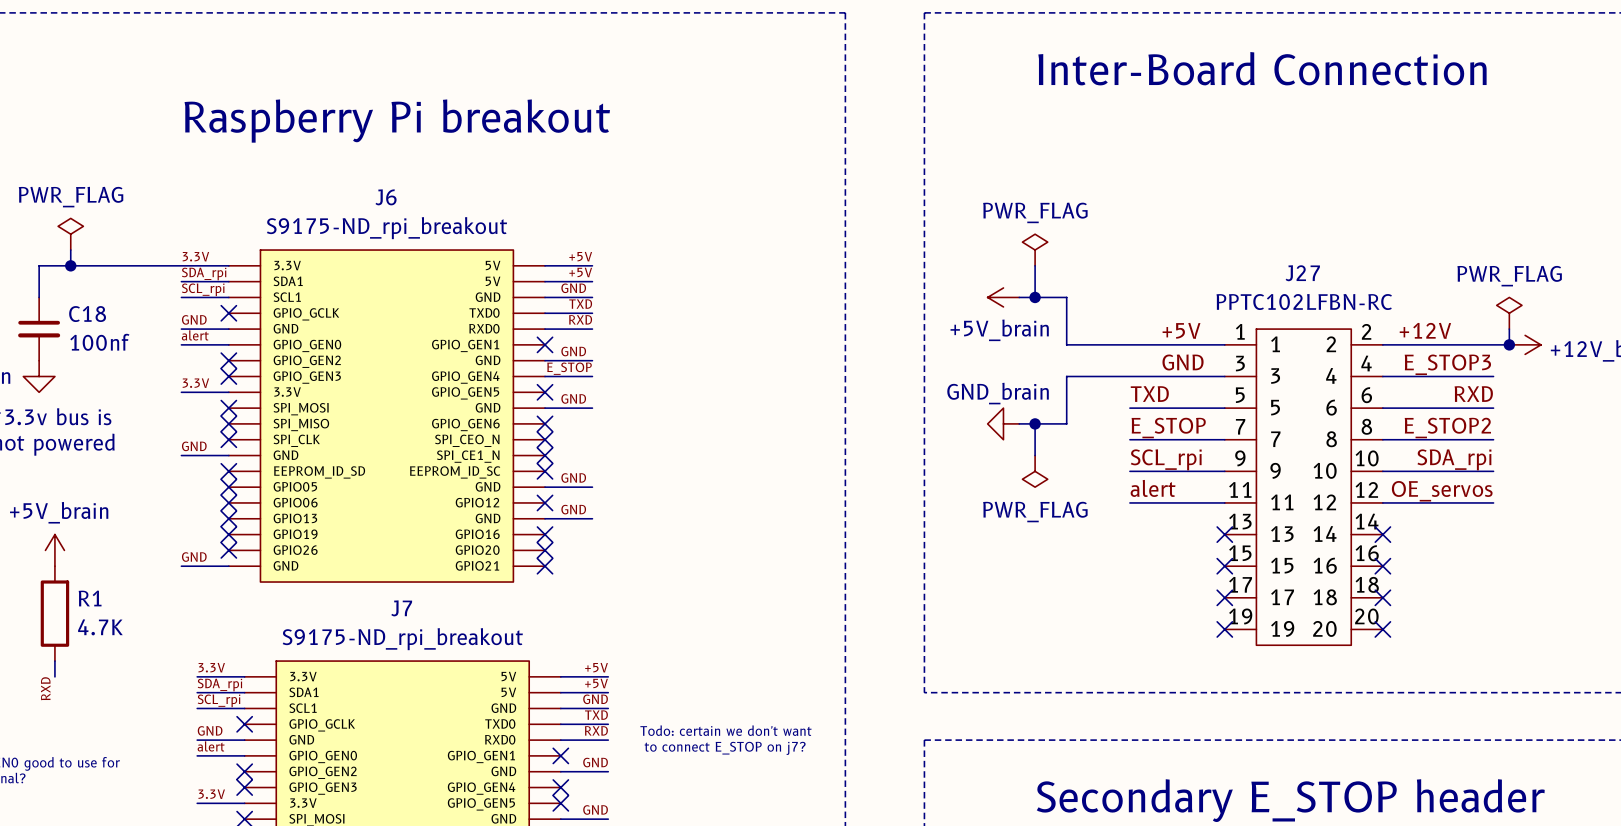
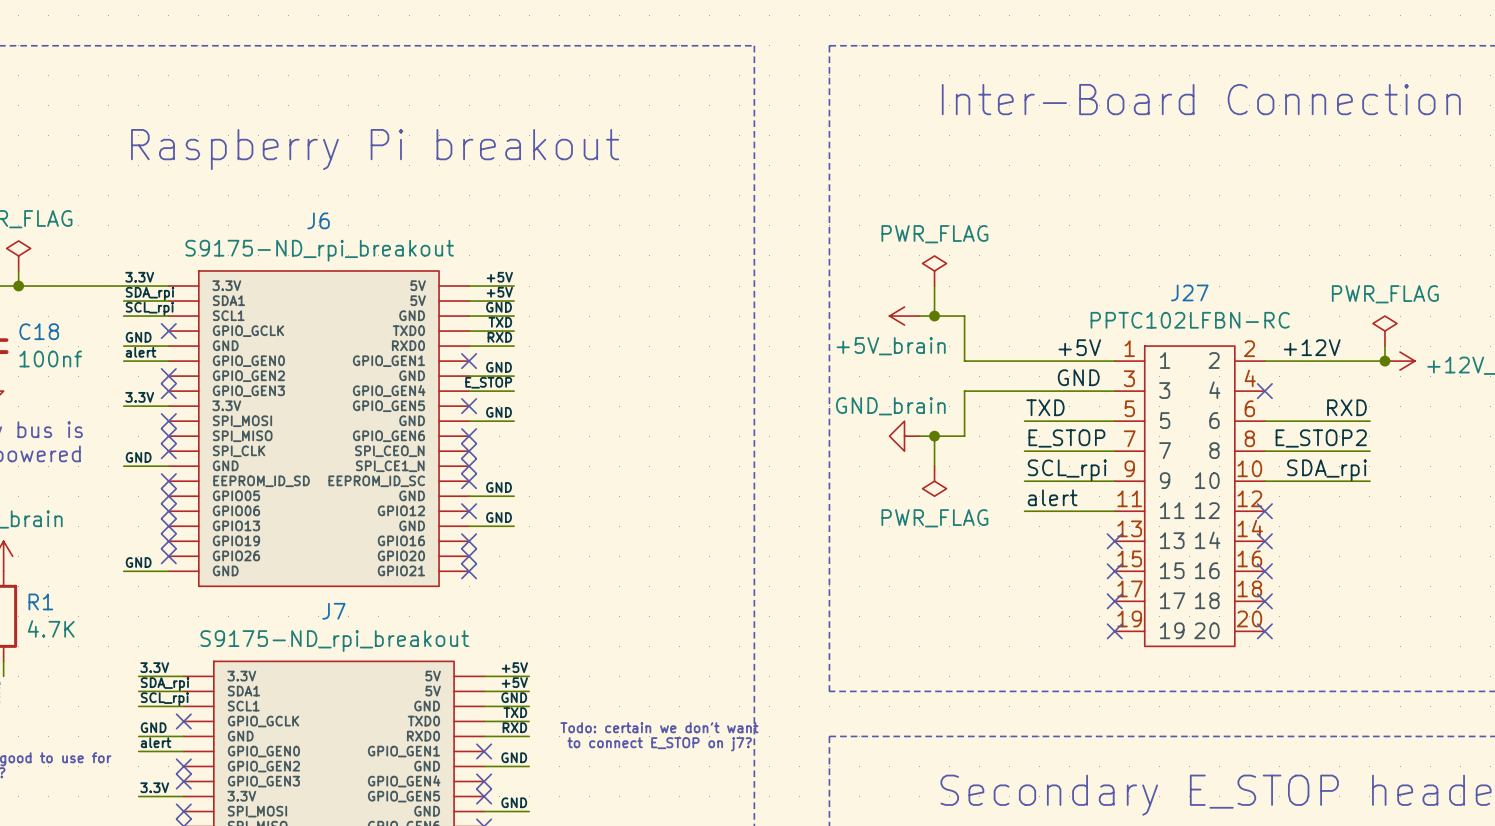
label: E_STOP3 (1447, 364) -> none
wire: (1382, 376) (1493, 376) -> none
no-connect mark: none -> (1264, 391)
label: OE_servos (1442, 491) -> none
wire: (1382, 502) (1493, 502) -> none
no-connect mark: none -> (1264, 511)

